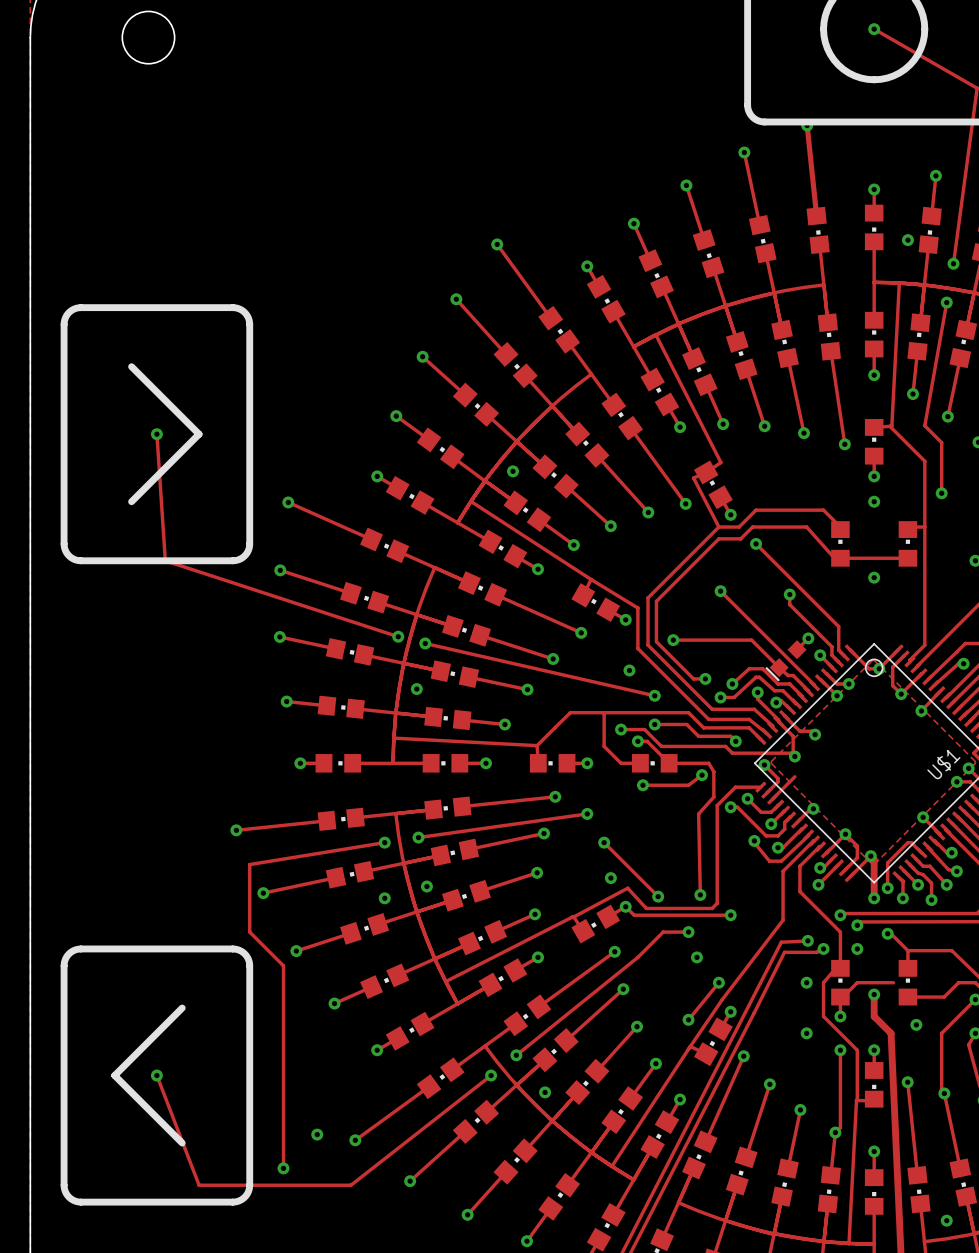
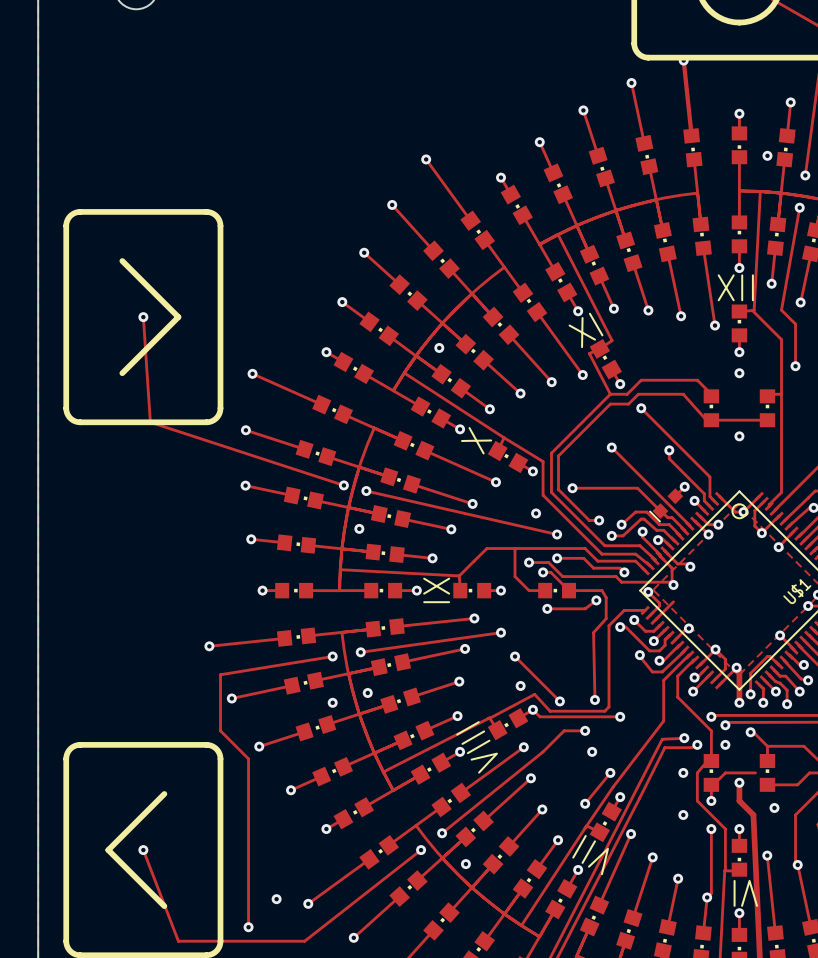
text: none -> XII (735, 287)
text: none -> XI (586, 330)
text: none -> X (476, 440)
text: none -> IX (436, 590)
text: none -> VIII (477, 747)
text: none -> VII (590, 855)
text: none -> VI (745, 893)

